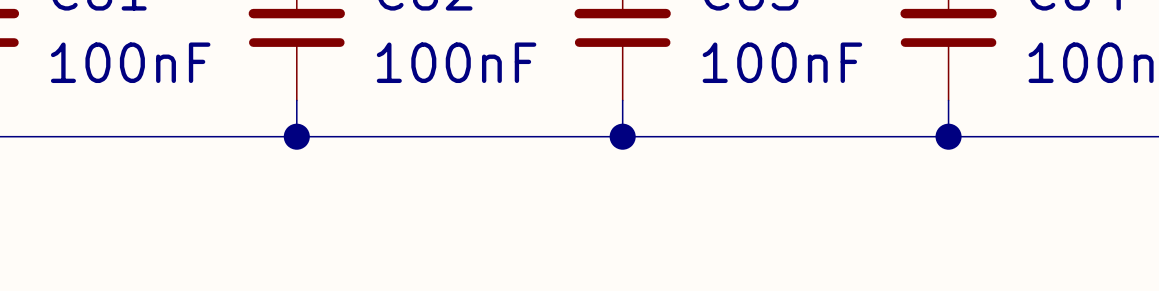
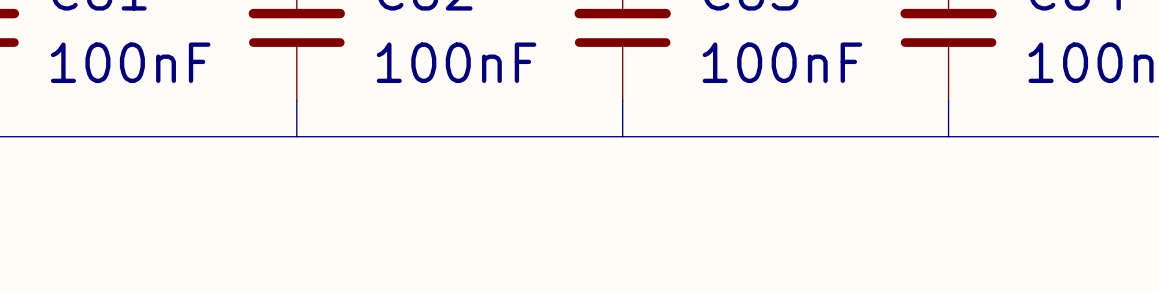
junction: (296, 136) -> none
junction: (622, 136) -> none
junction: (948, 136) -> none

